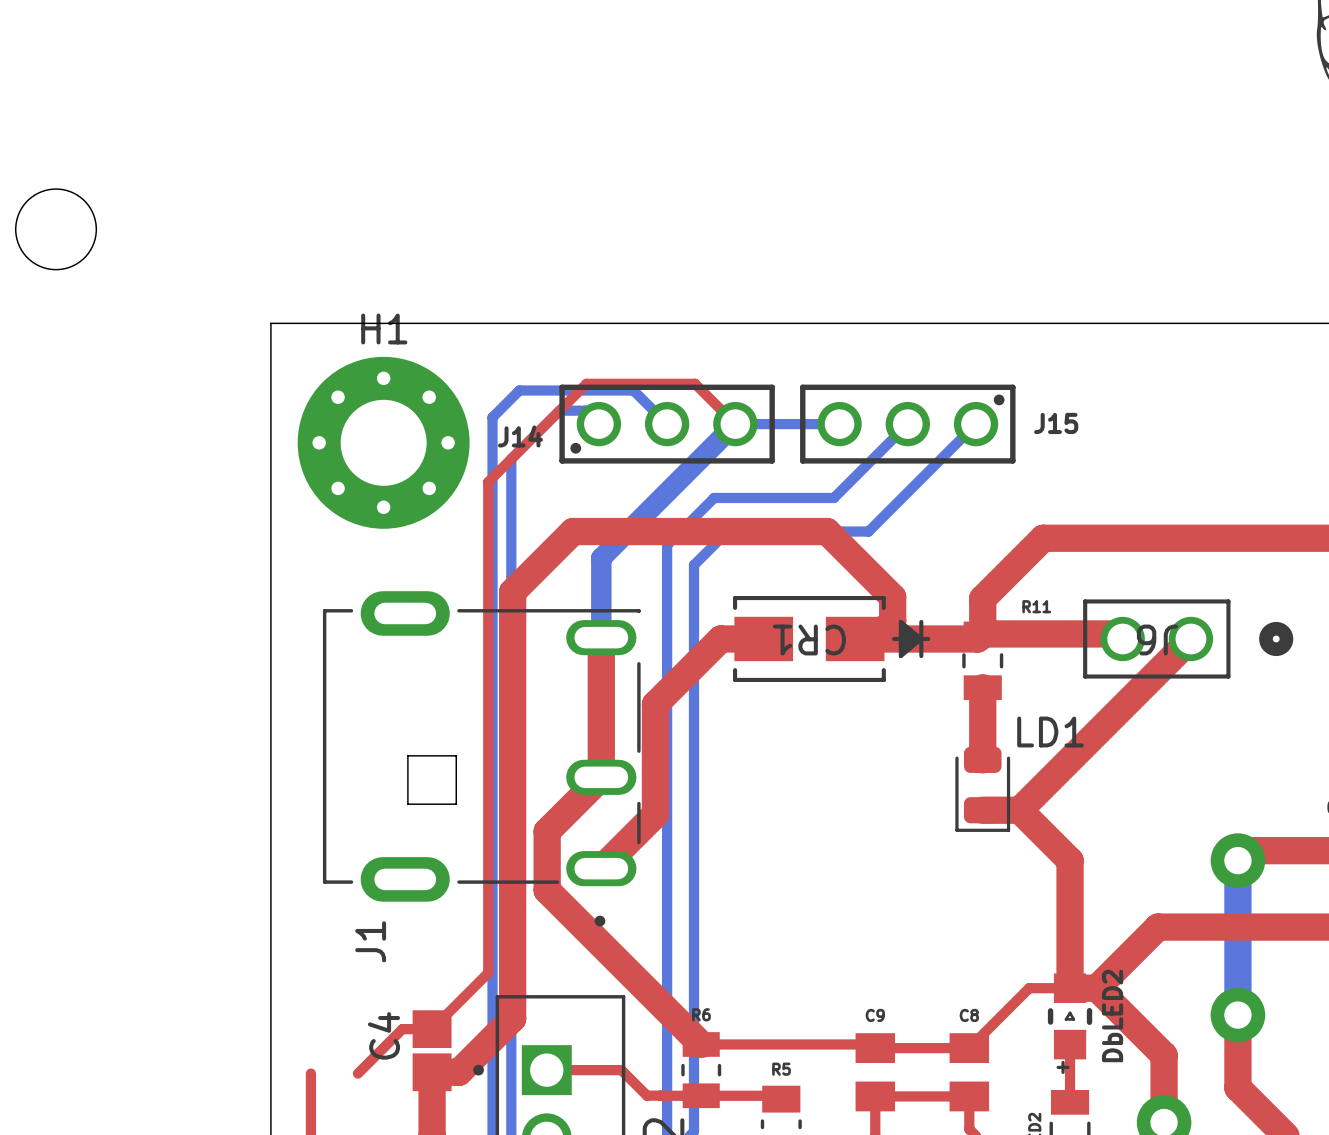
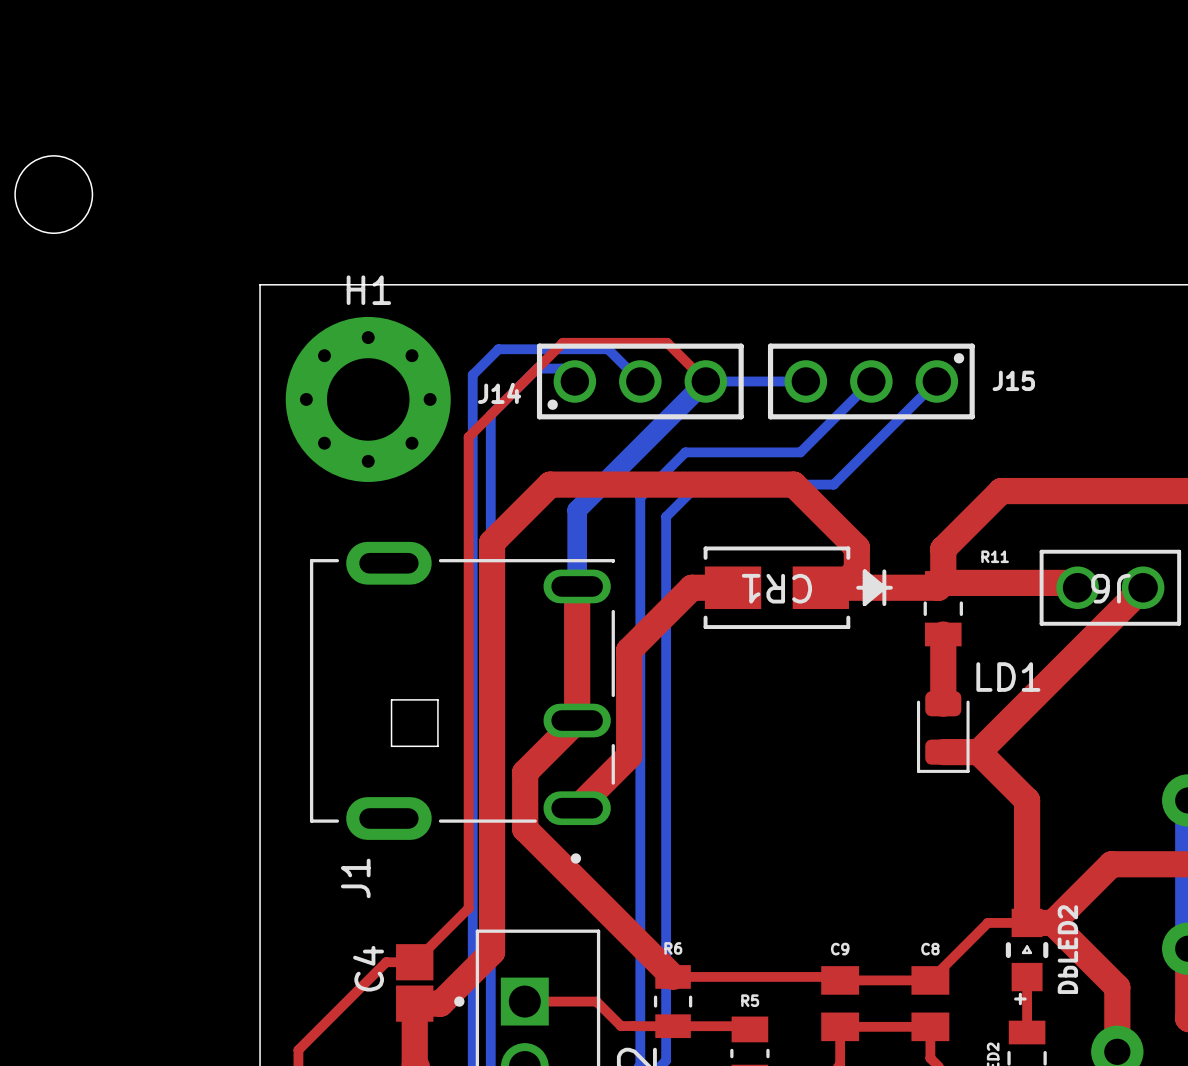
top track: (310, 1073) (310, 1120) -> (343, 1004) (298, 1050)

